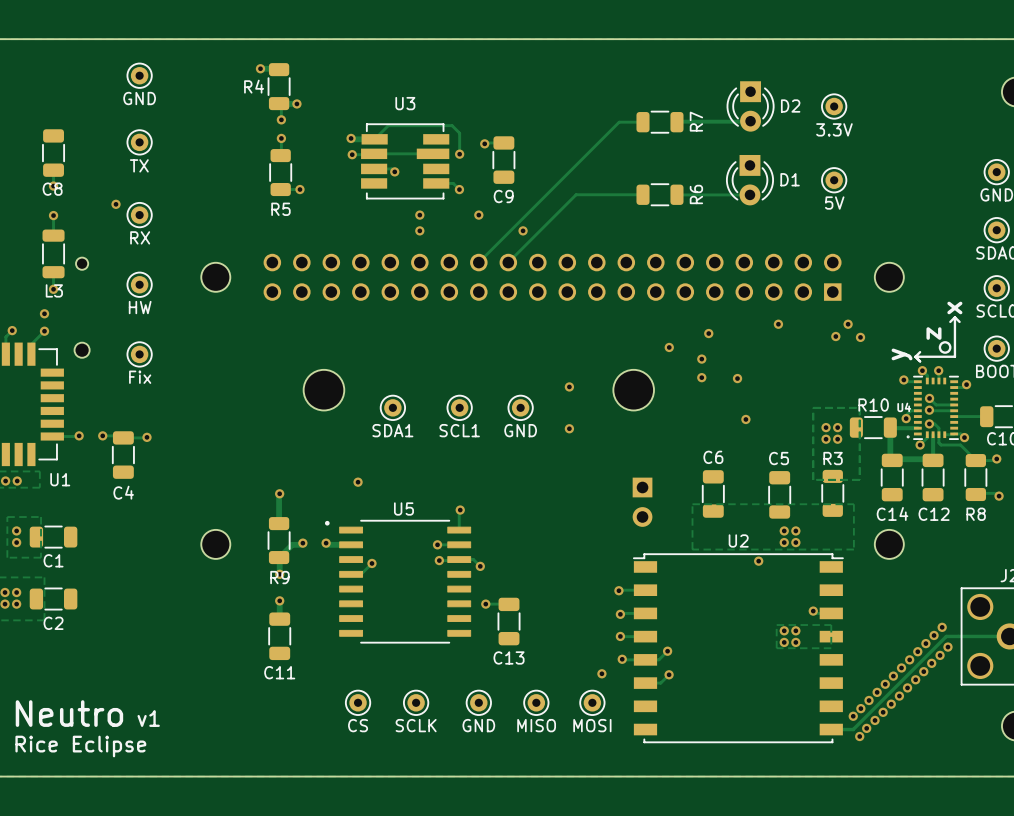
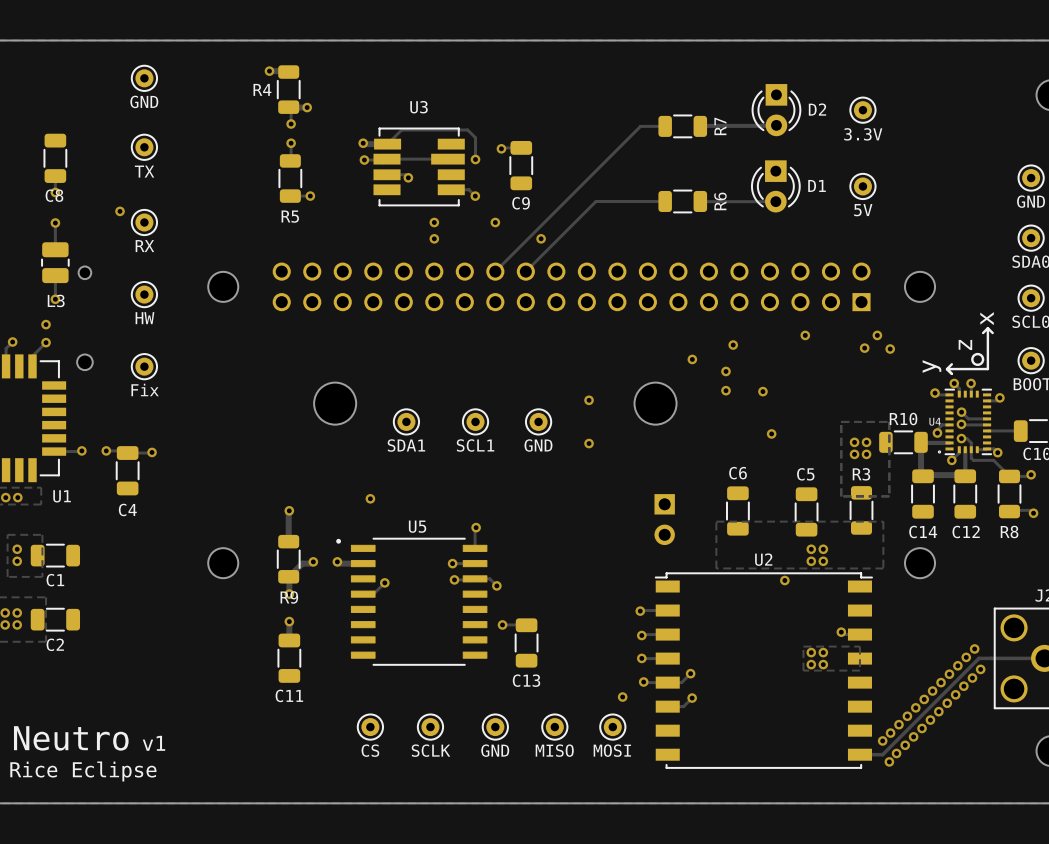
L3 footprint: [42, 229, 65, 279] -> [41, 242, 70, 284]

